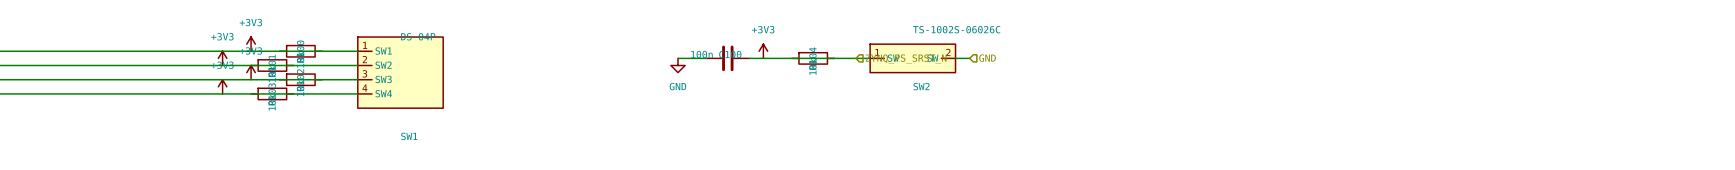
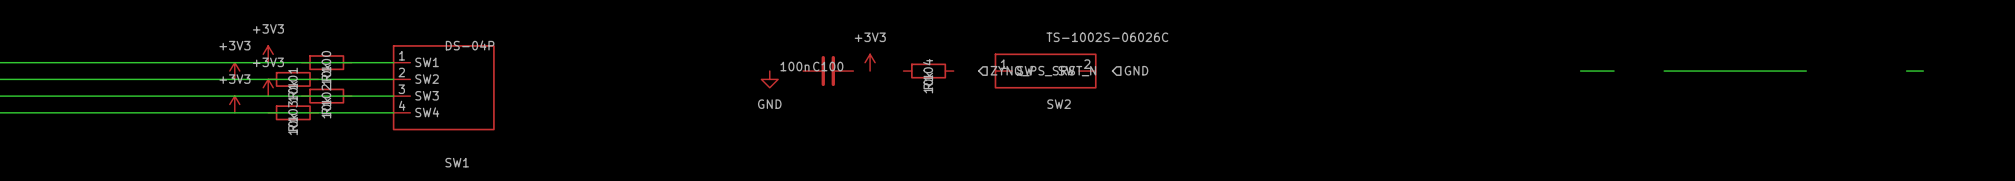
wire: (678, 58) (706, 58) -> none
wire: (749, 58) (870, 58) -> none
wire: (955, 58) (969, 58) -> none
wire: none -> (1580, 71) (1614, 71)
wire: none -> (1664, 71) (1806, 71)
wire: none -> (1906, 71) (1923, 71)

